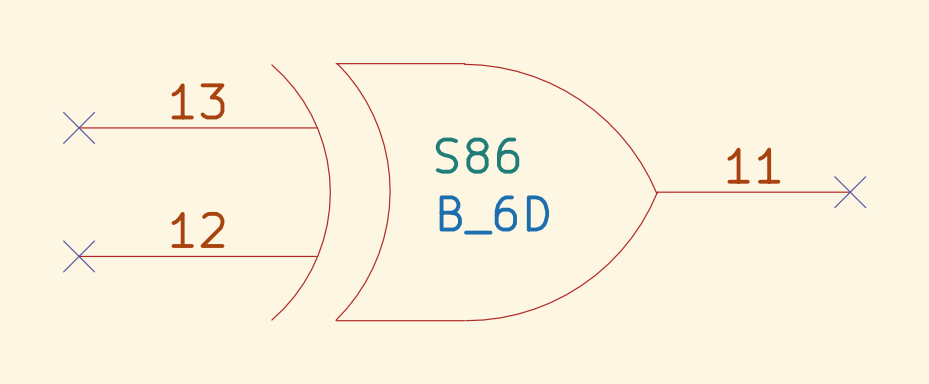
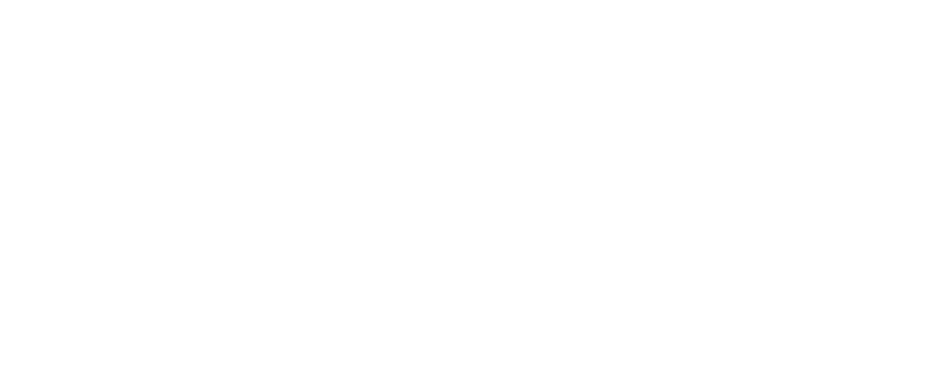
no-connect mark: (79, 127) -> none
B_6D: S86 (464, 192) -> none
no-connect mark: (850, 192) -> none
no-connect mark: (79, 256) -> none

